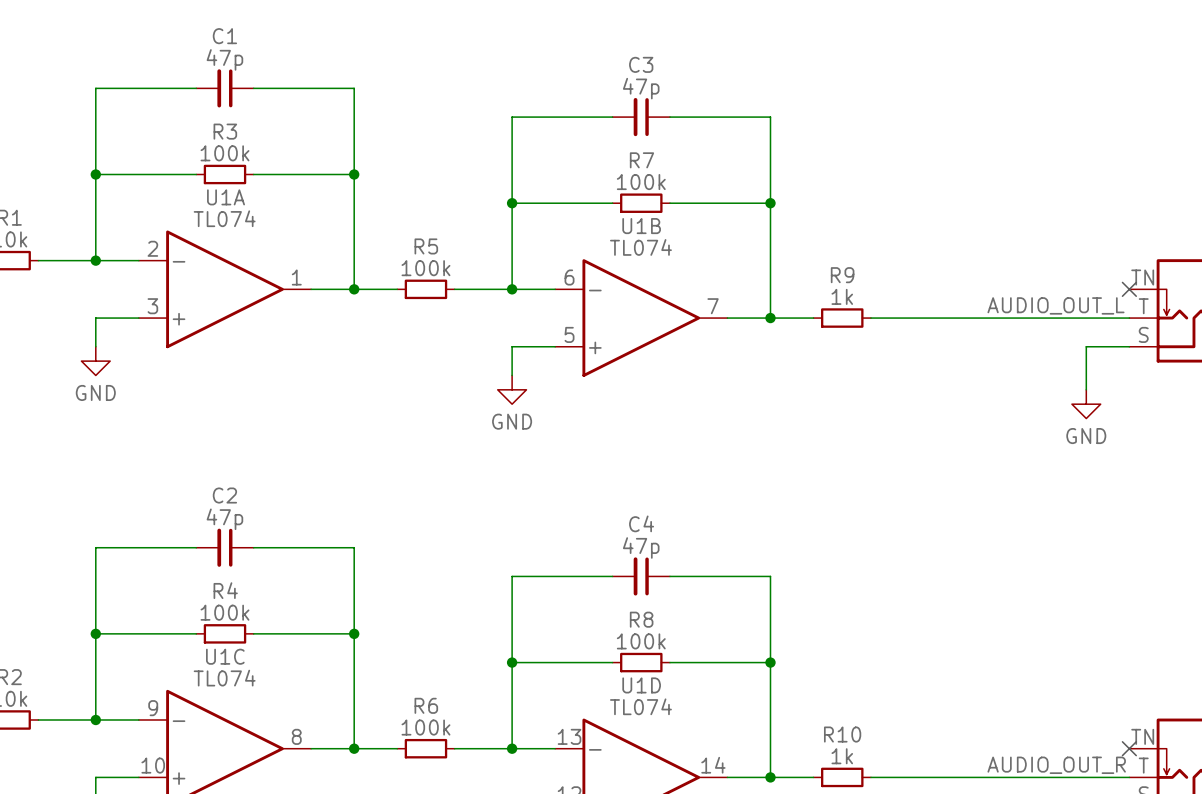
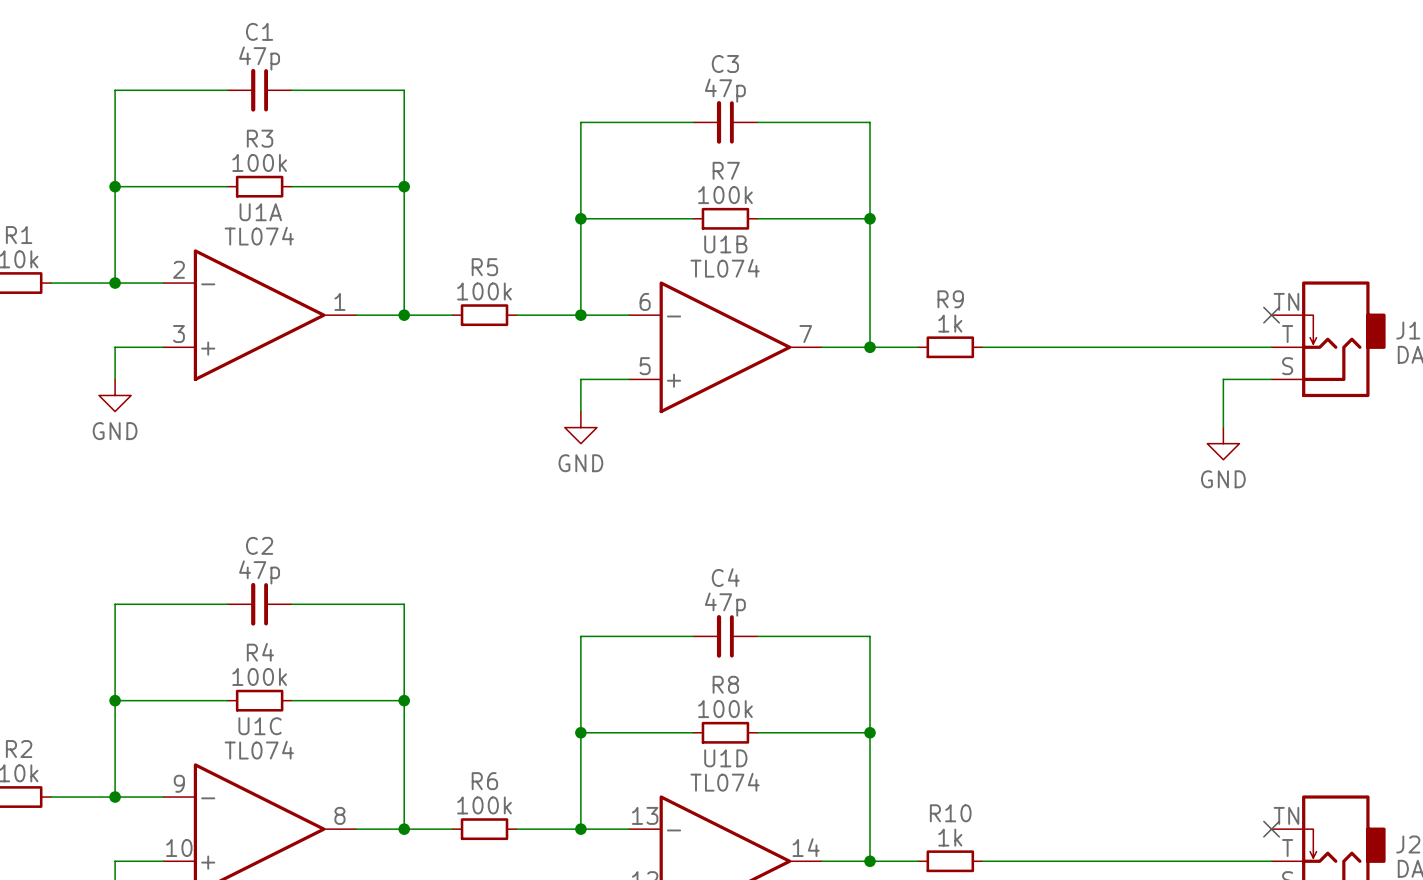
label: AUDIO_OUT_L (1055, 305) -> none
label: AUDIO_OUT_R (1056, 765) -> none

